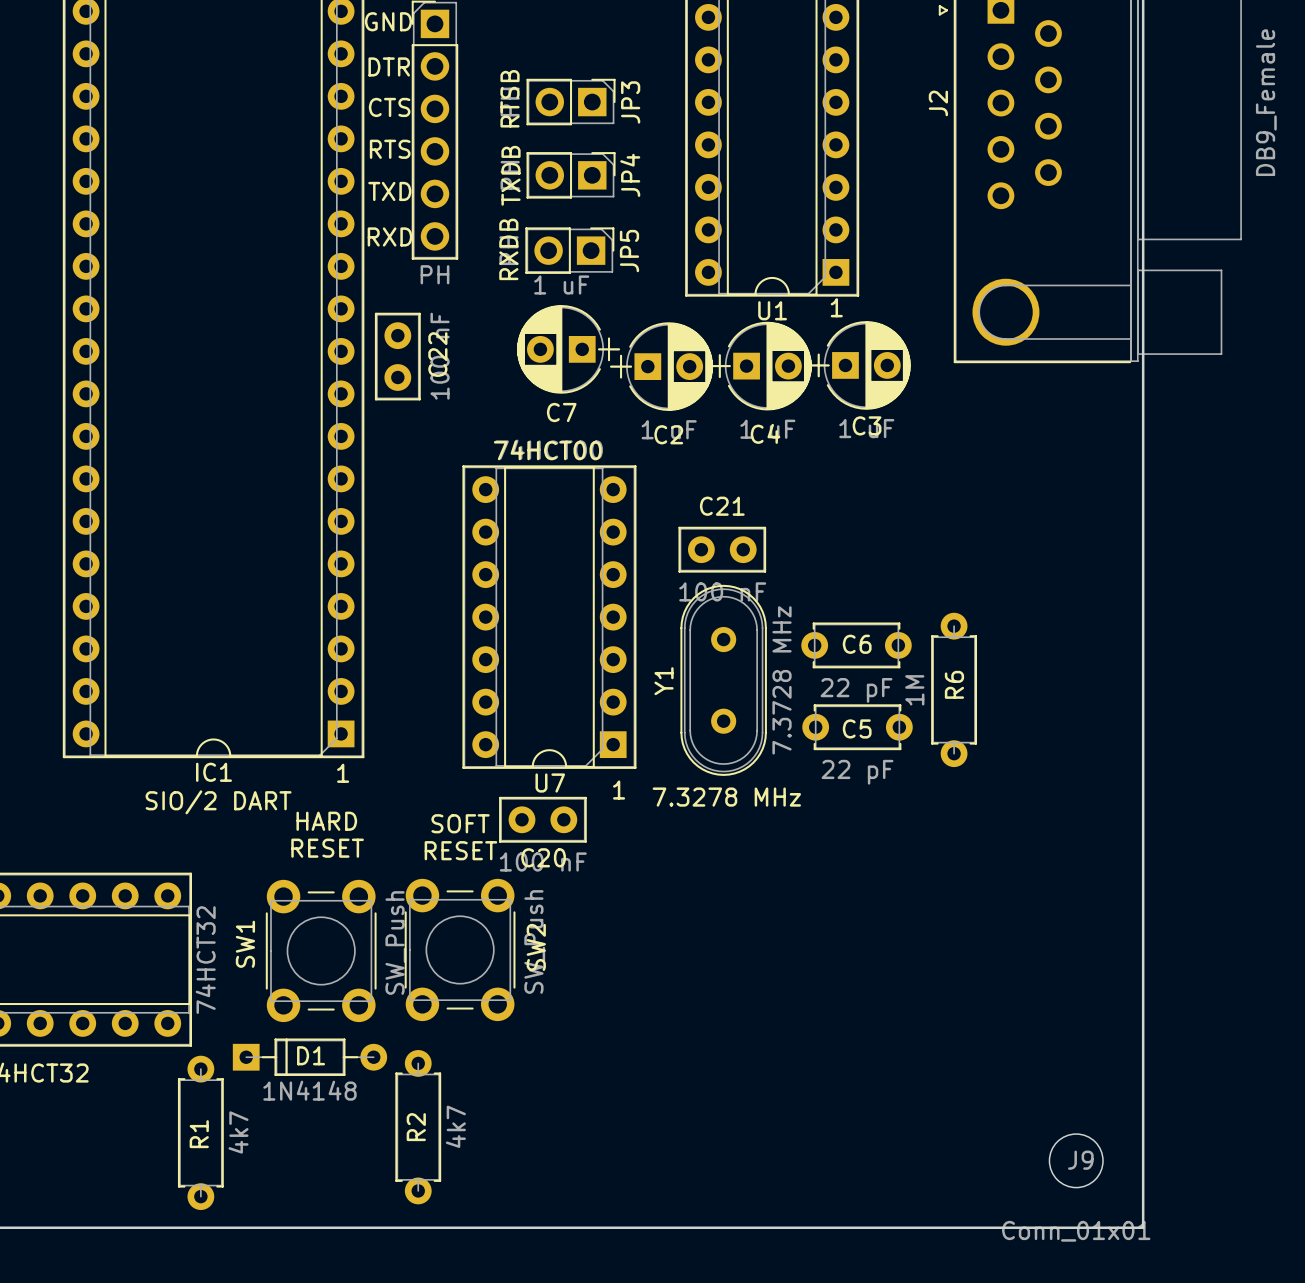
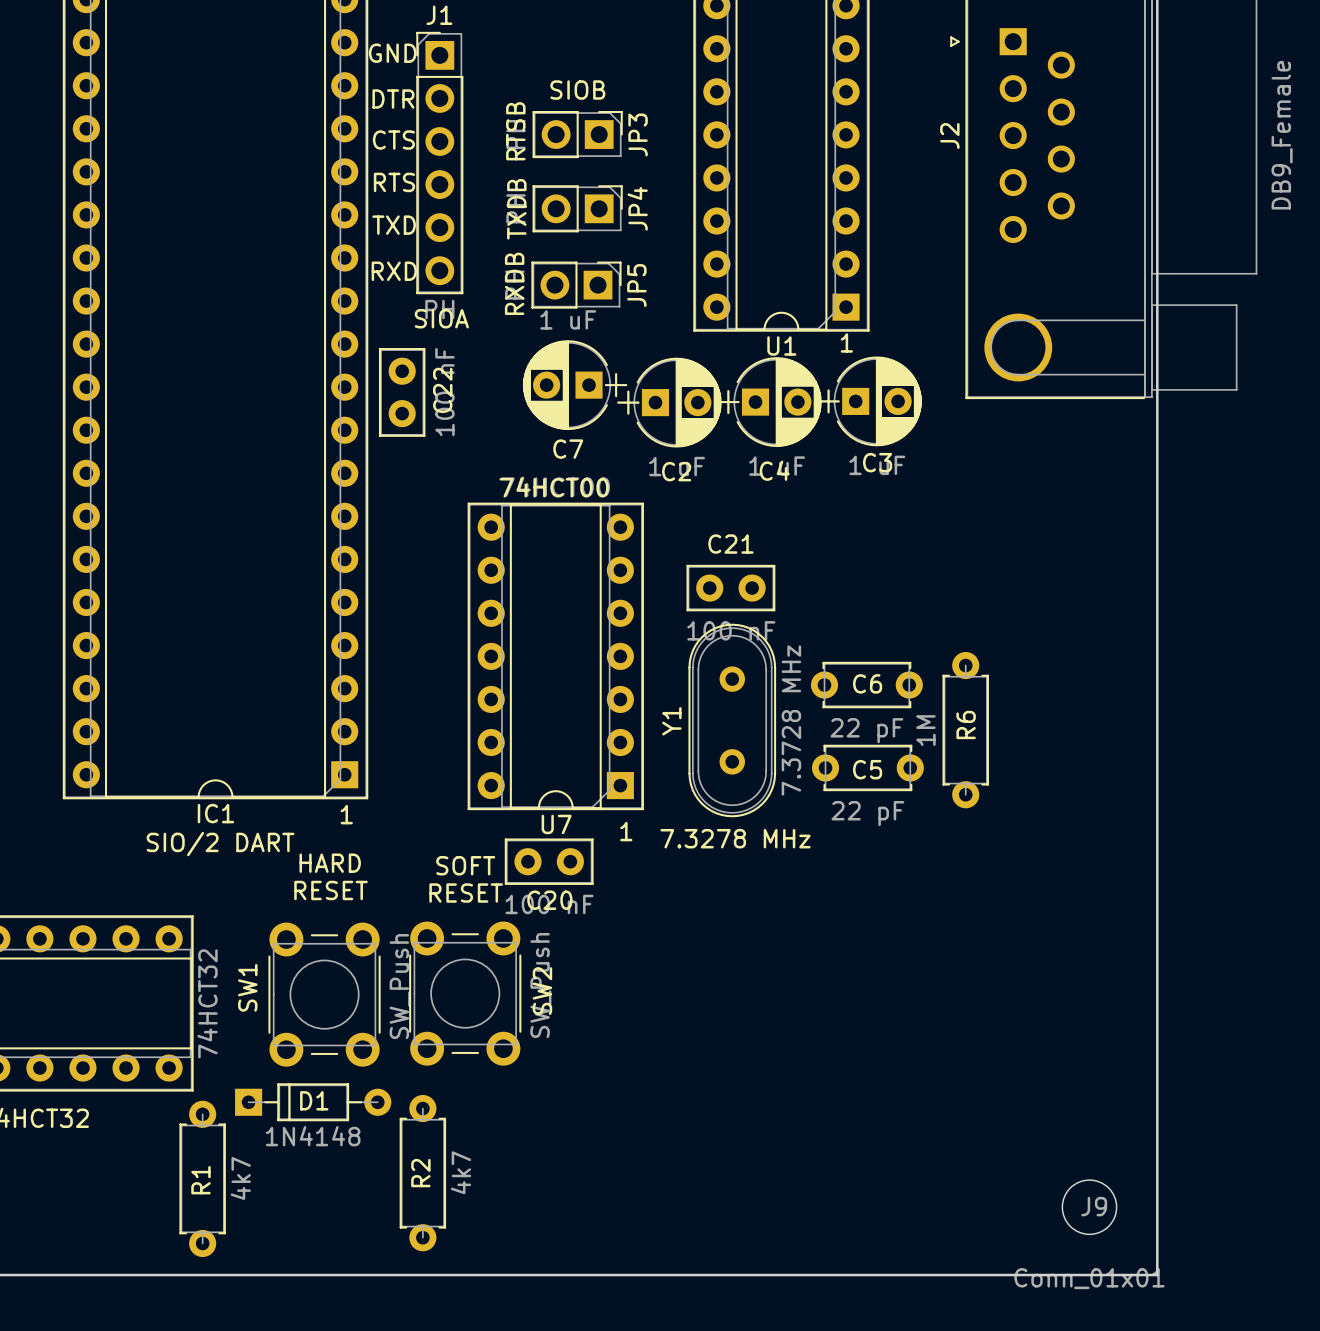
text: none -> SIOB (577, 90)
text: none -> SIOA (441, 318)

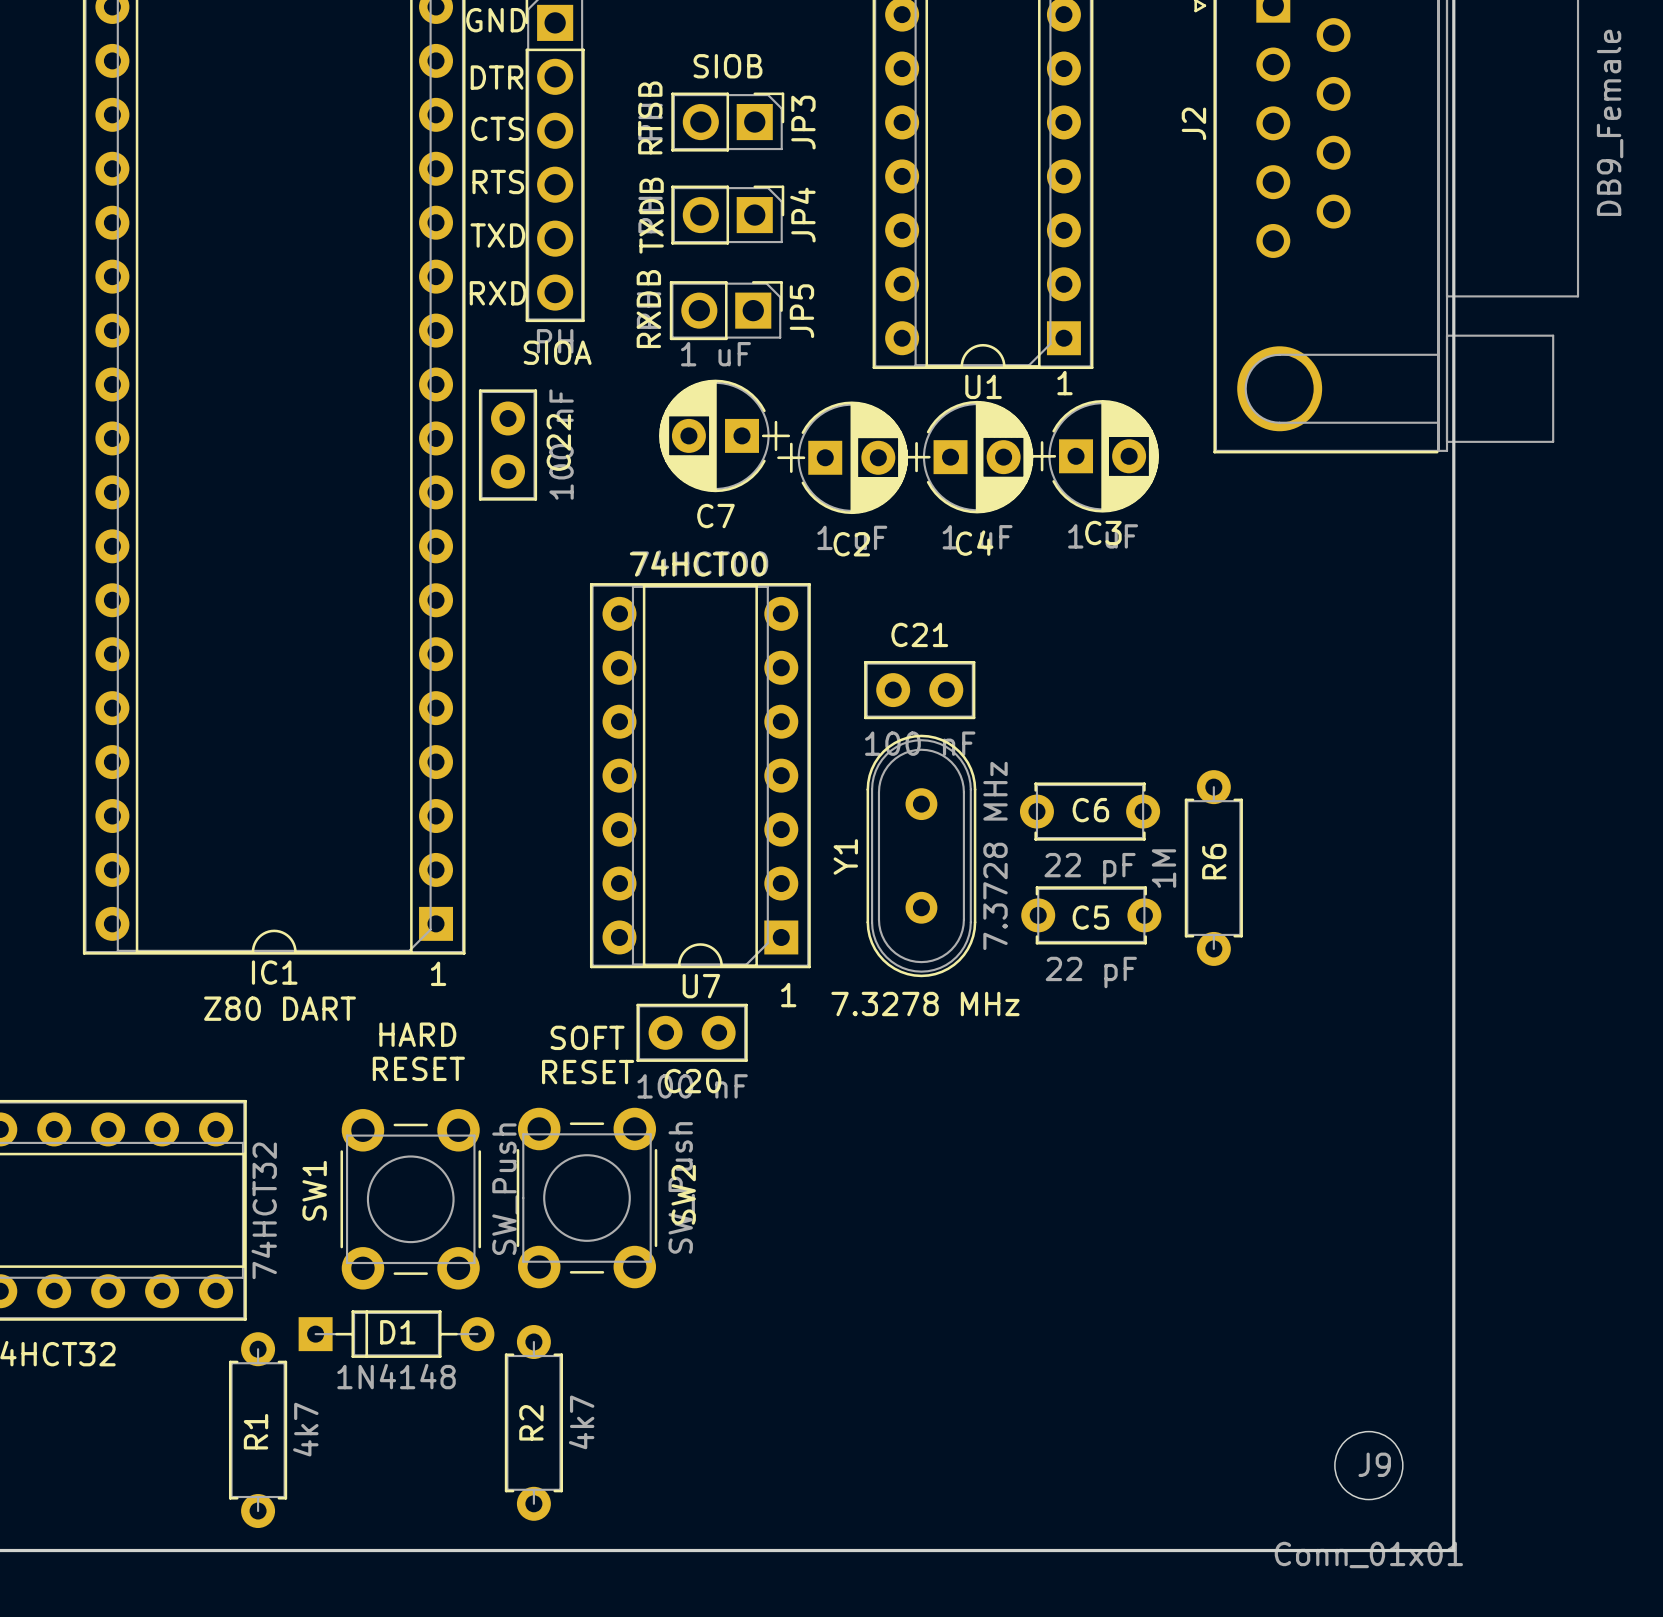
text: SIO/2 DART (220, 844) -> Z80 DART (280, 1008)

